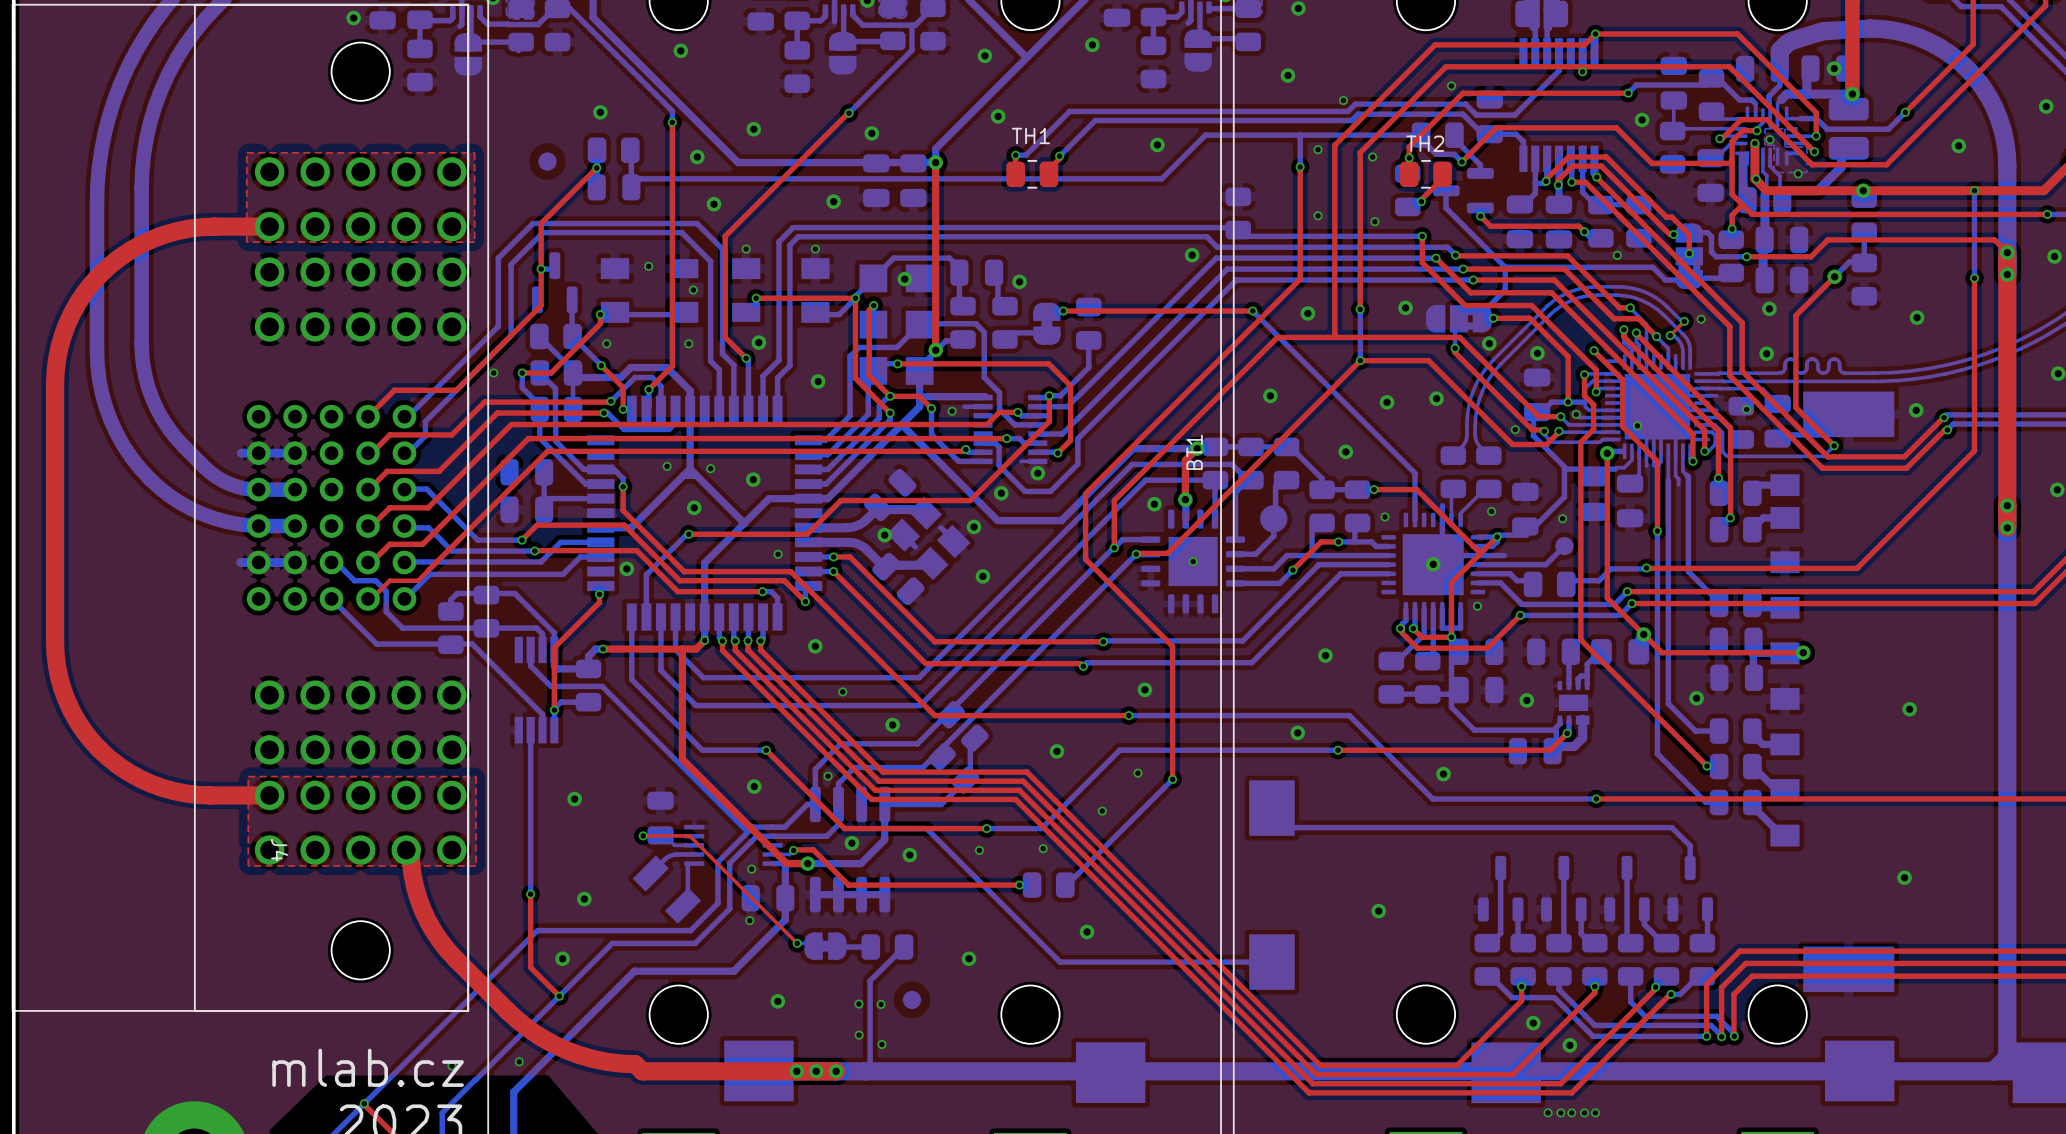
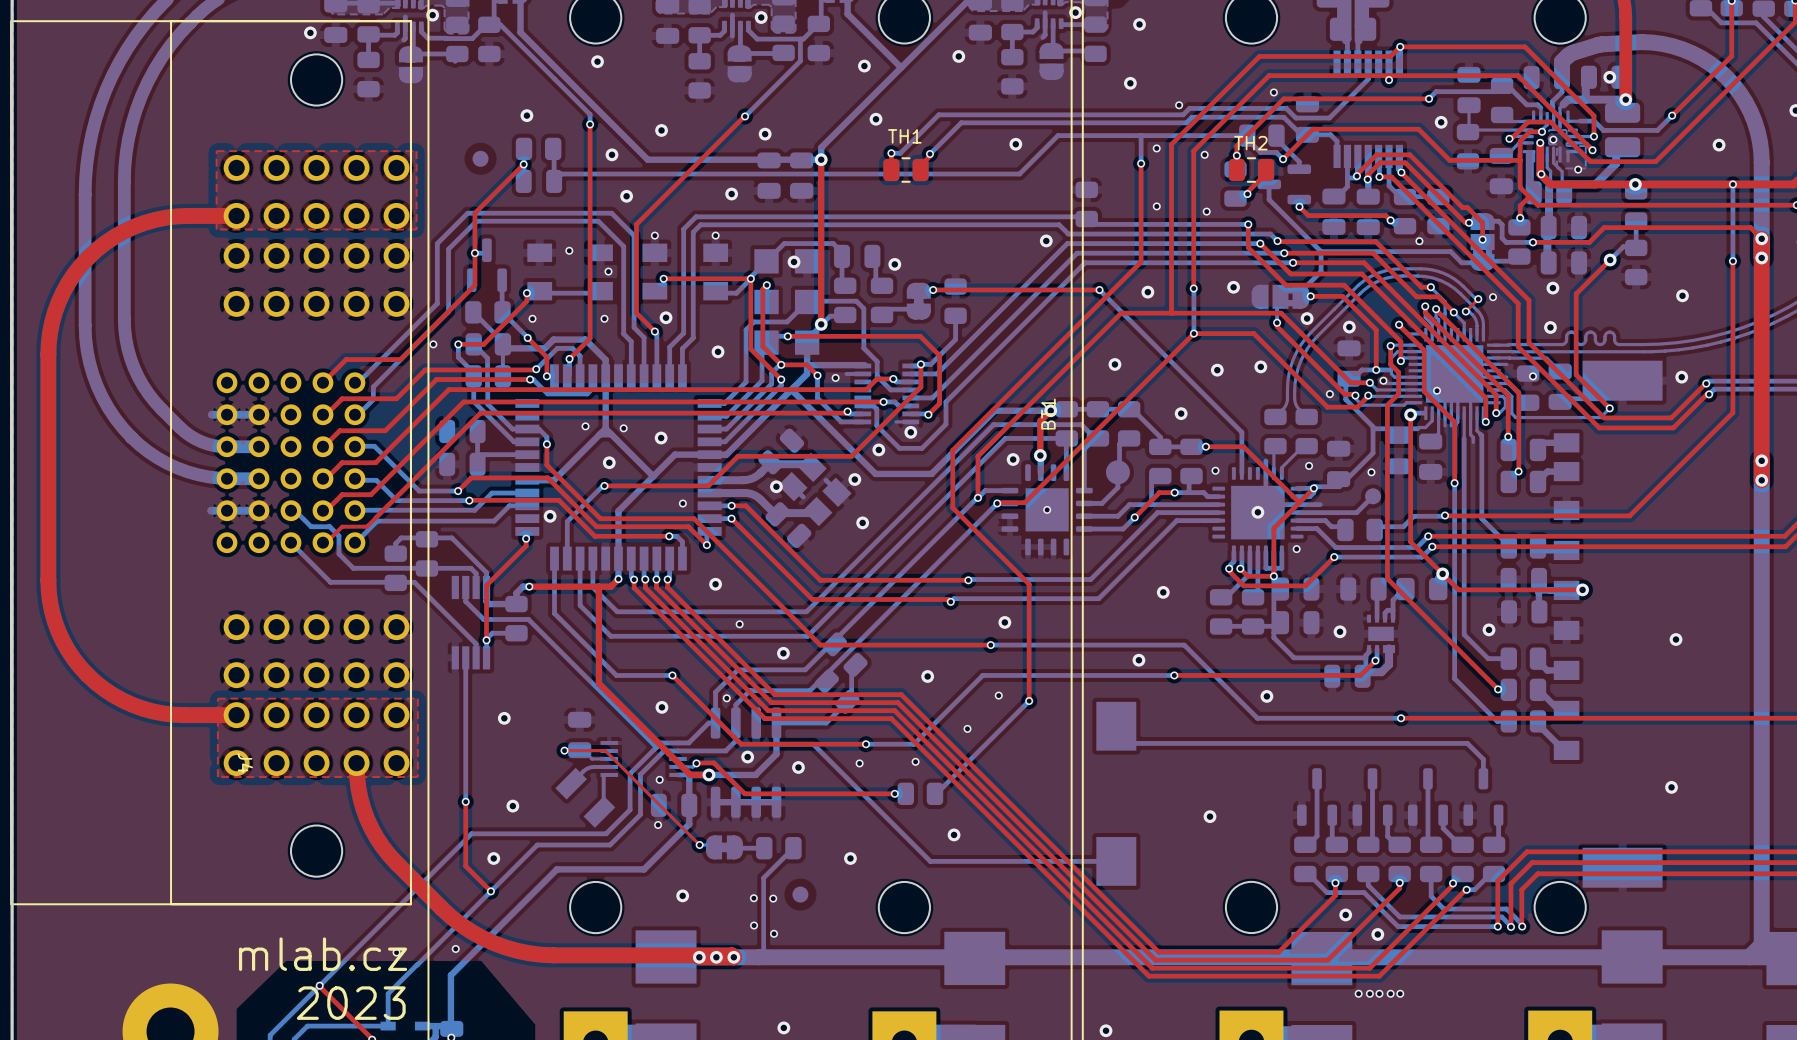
top track: (410, 849) (412, 873) (418, 897) (427, 919) (440, 940) (507, 1010) (540, 1037) (579, 1055) (606, 1061) (635, 1064) (642, 1071) (796, 1071) -> none
top track: none -> (356, 766) (360, 798) (367, 819) (376, 838) (389, 855) (441, 908)
top track: none -> (441, 908) (460, 924) (481, 937) (504, 947) (529, 953) (554, 955) (731, 955) (733, 957)

